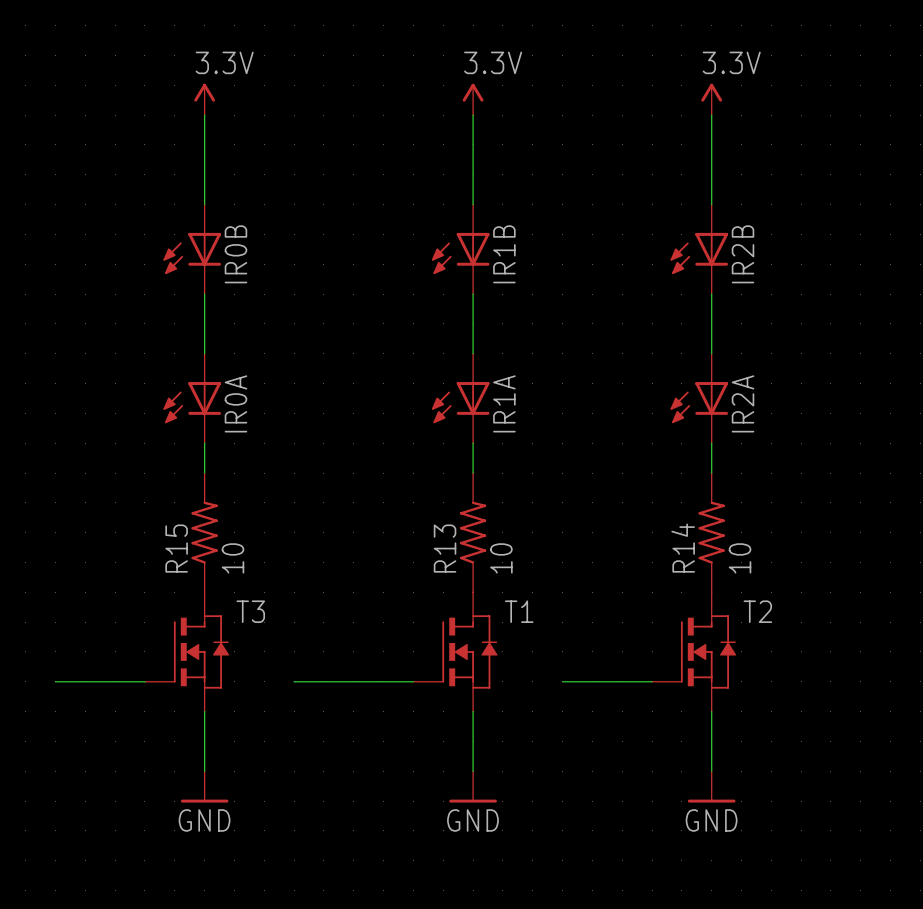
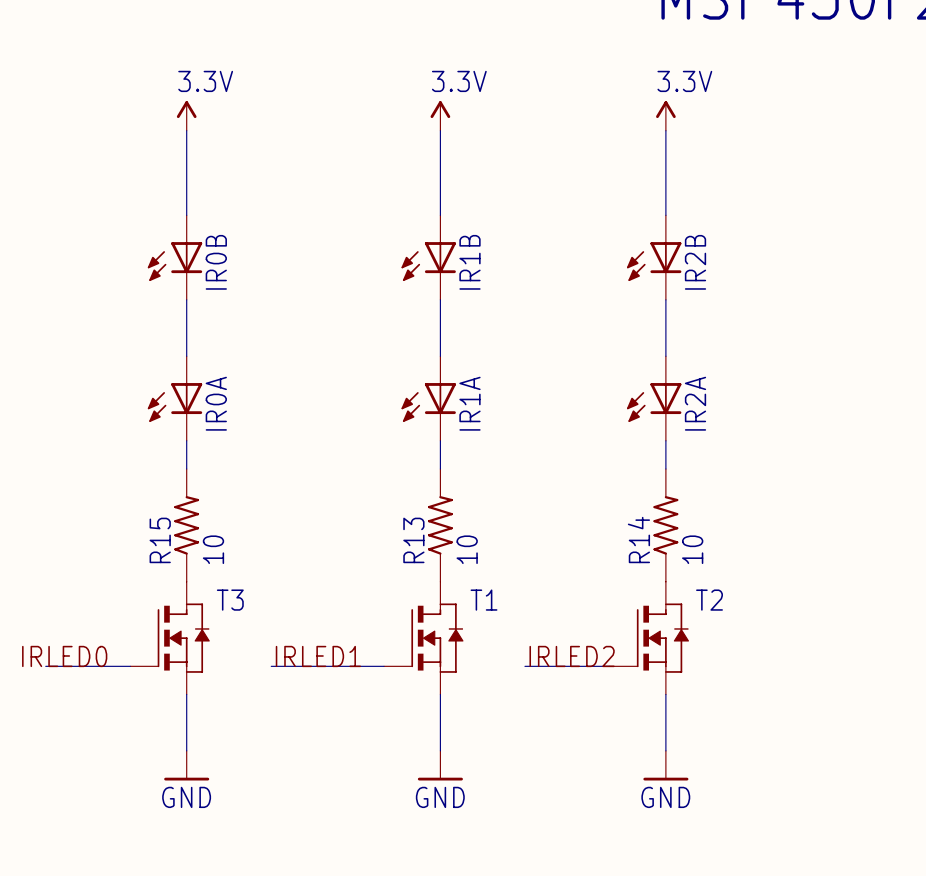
label: none -> IRLED0 (64, 656)
label: none -> IRLED1 (318, 656)
label: none -> IRLED2 (572, 656)

